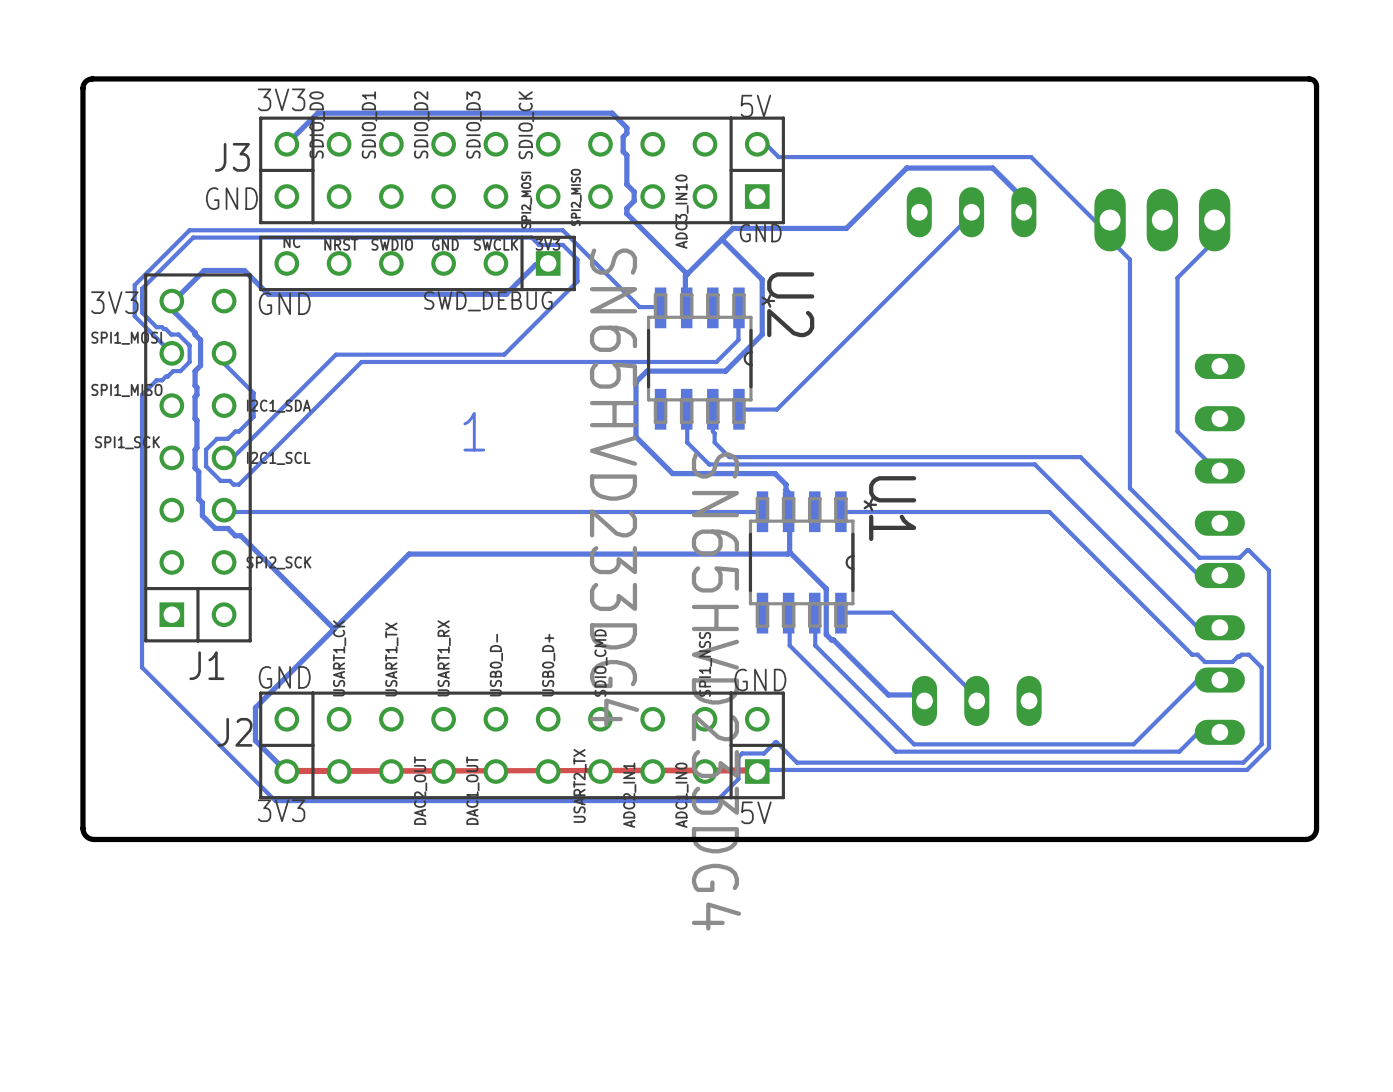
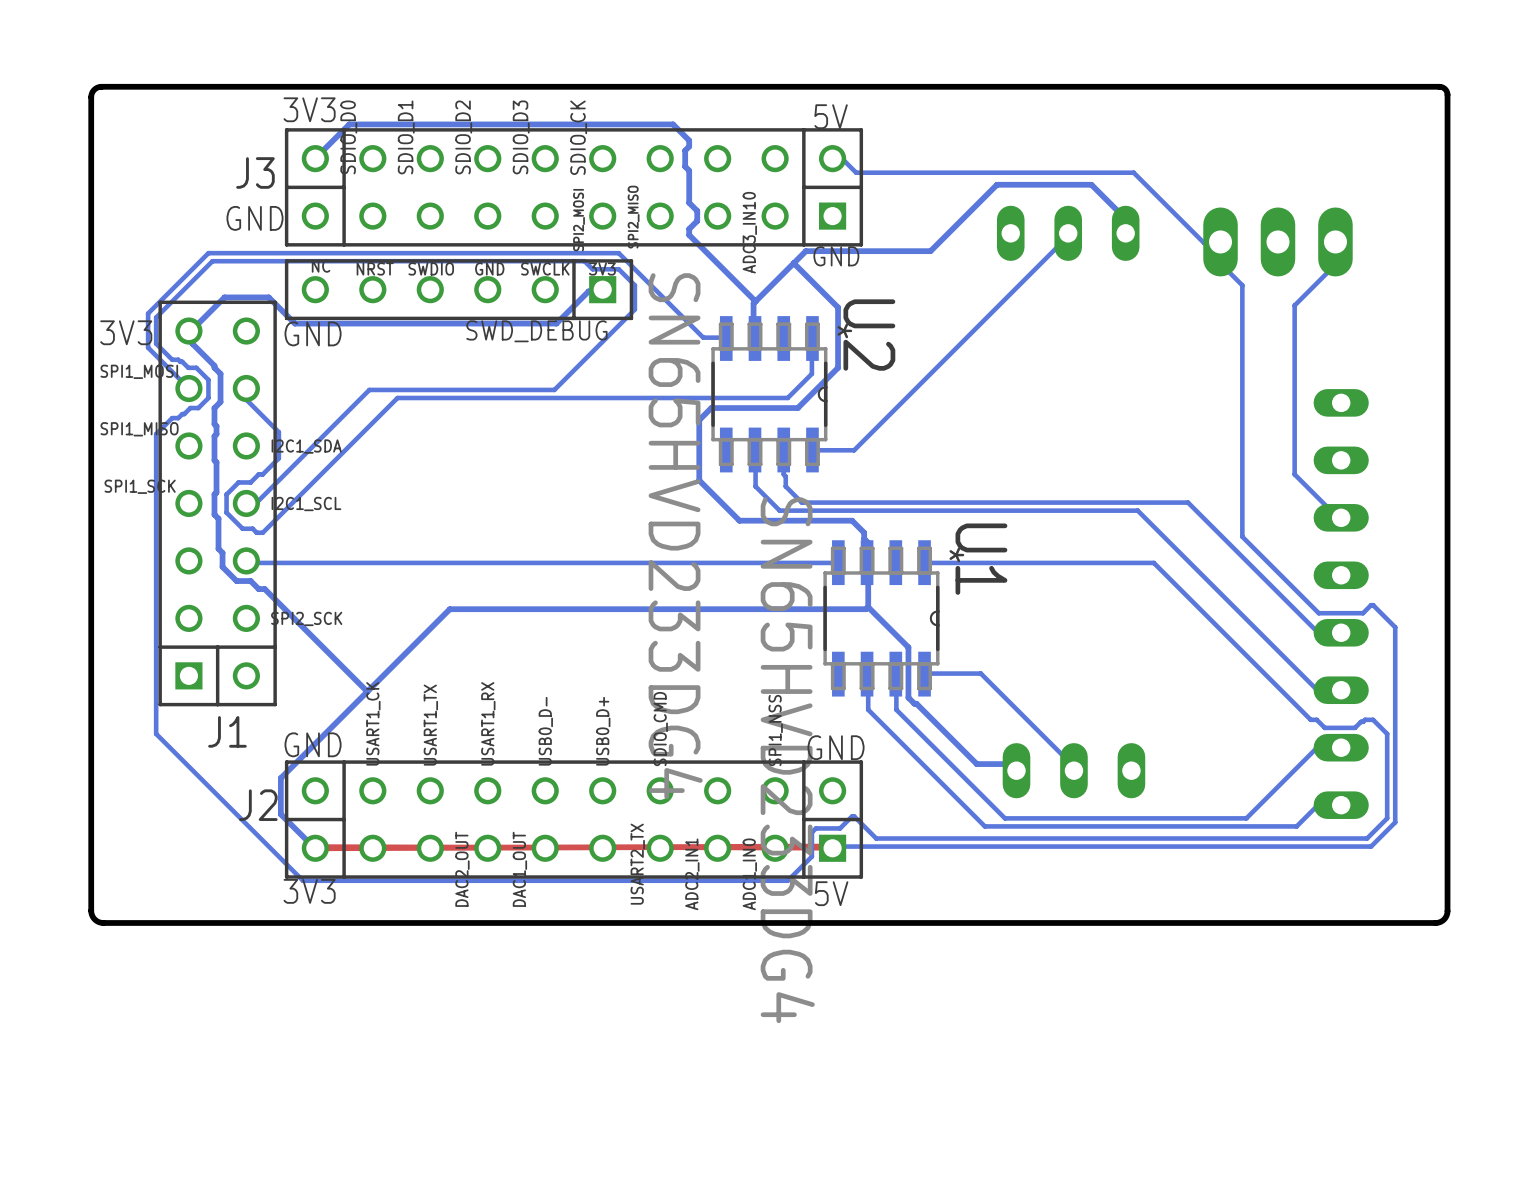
text: 1 (474, 431) -> none

